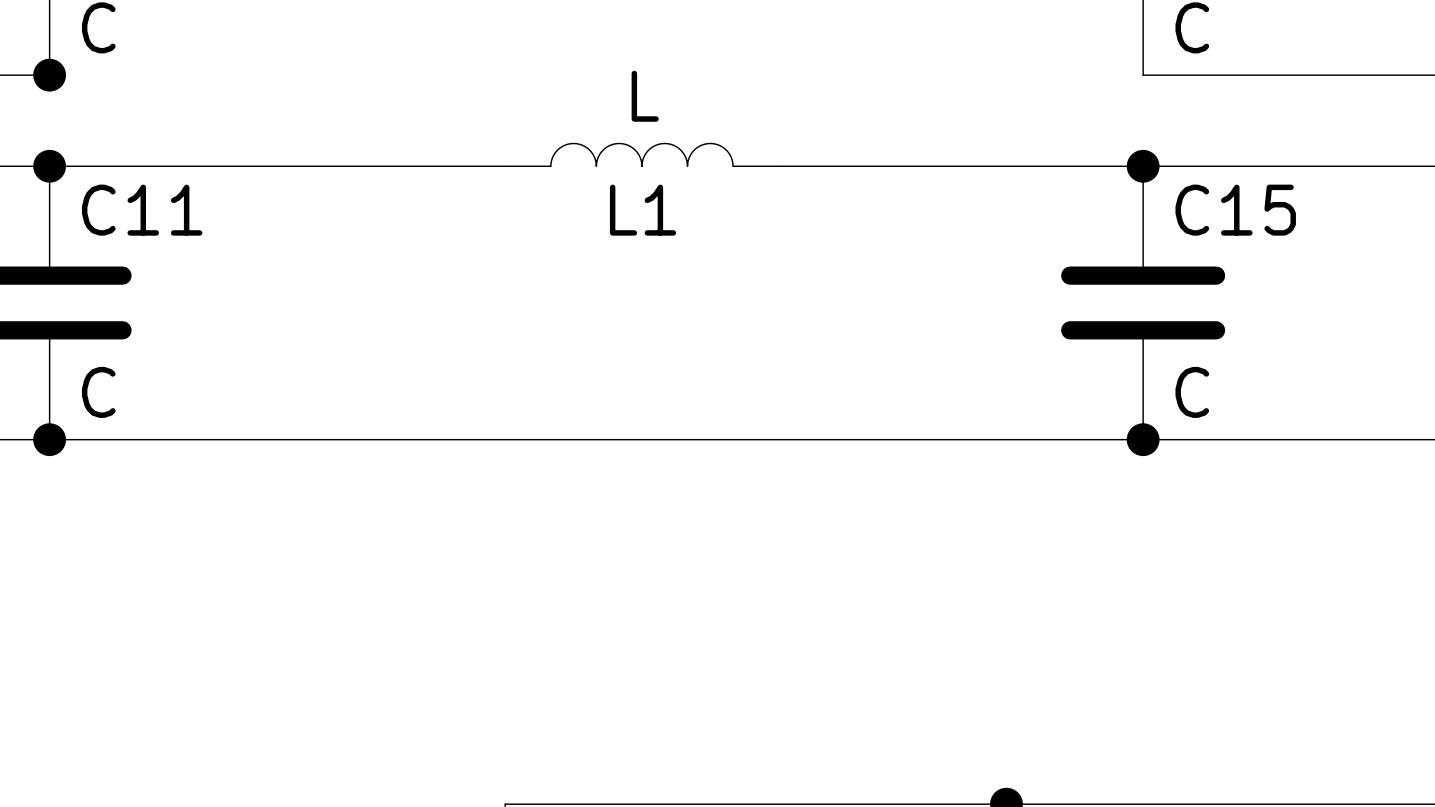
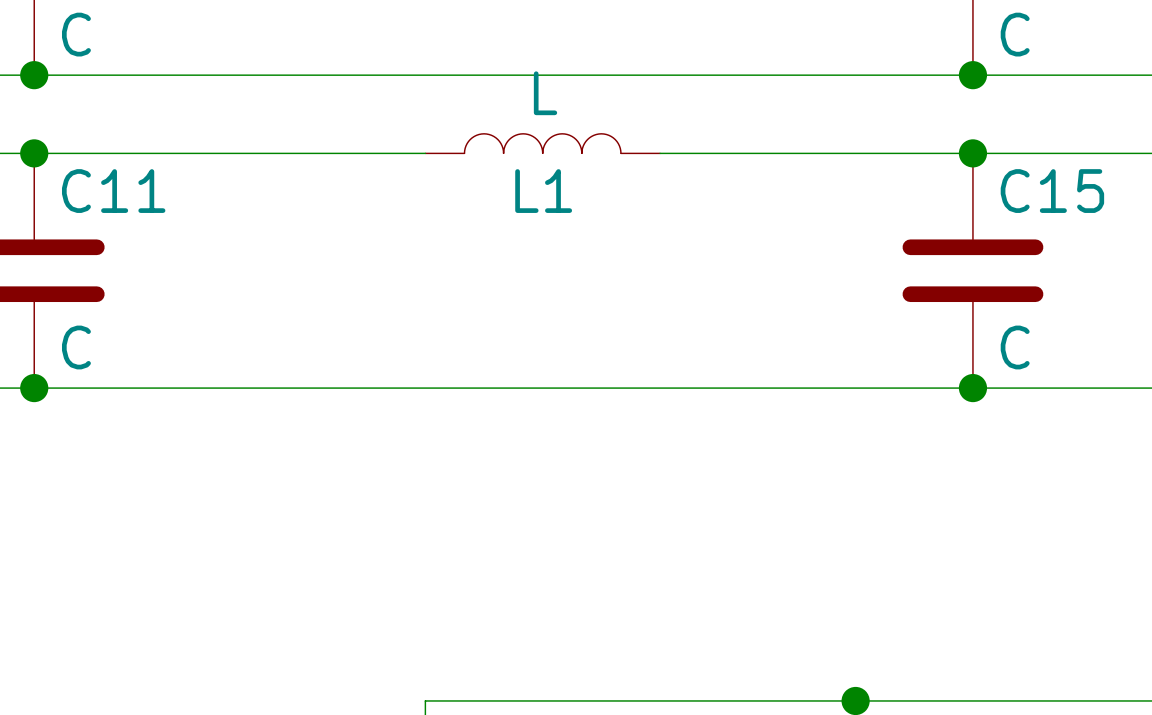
wire: none -> (34, 75) (972, 75)
junction: none -> (972, 75)

